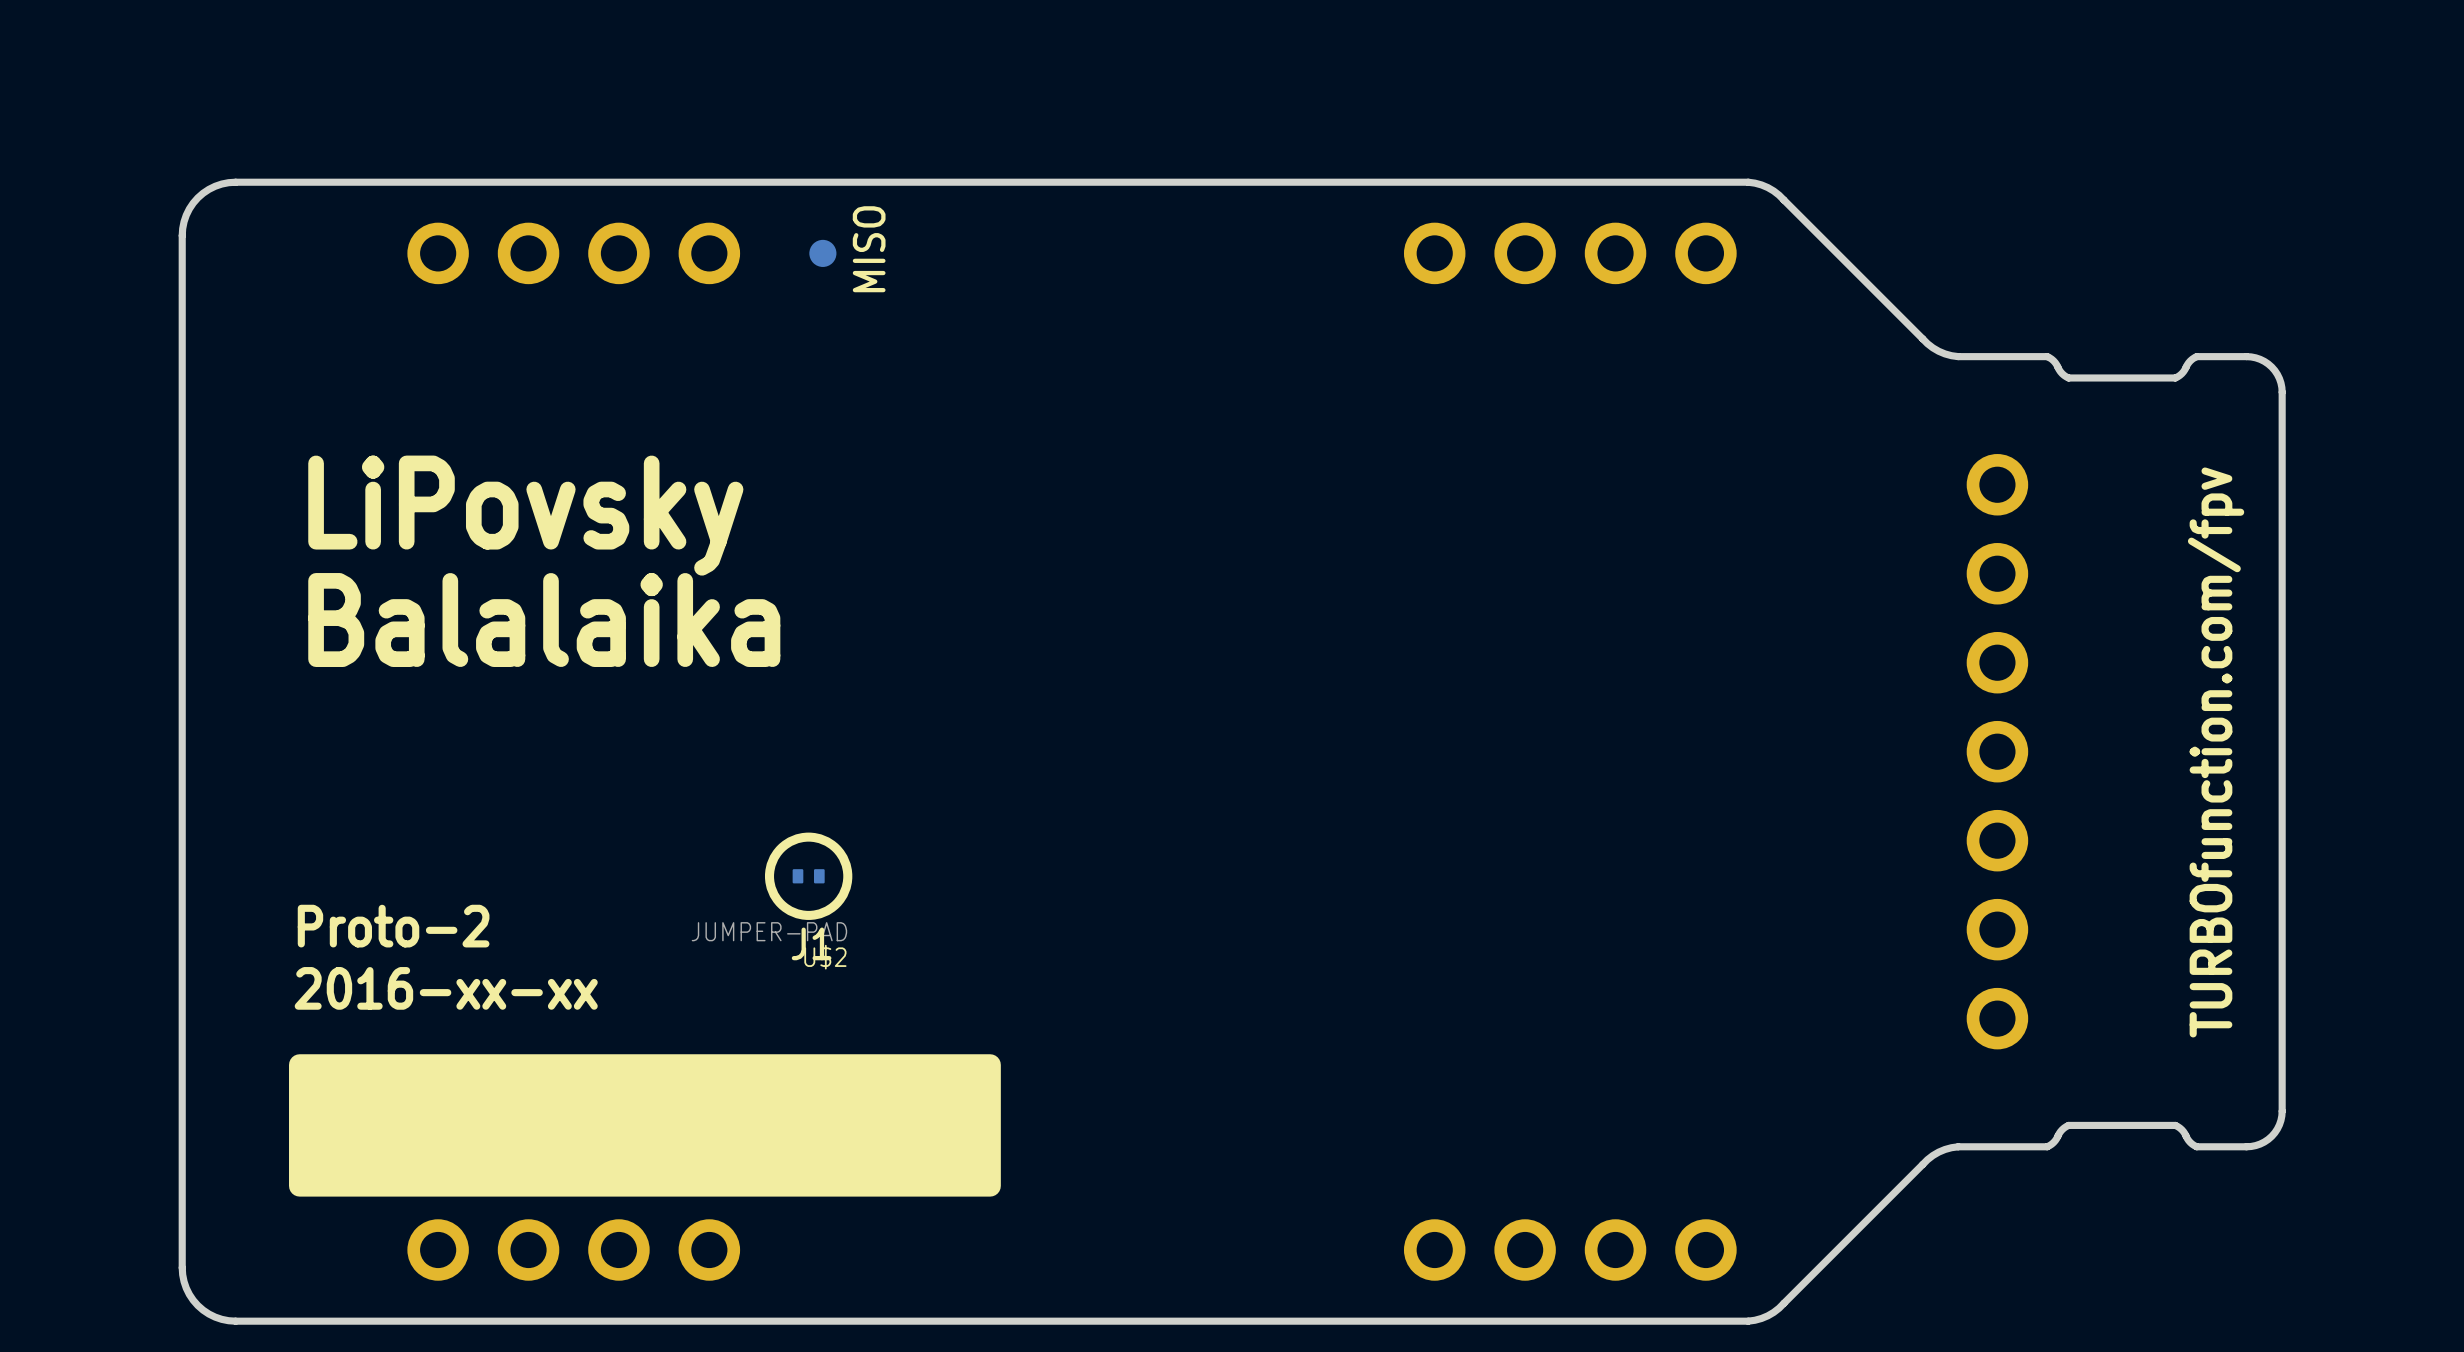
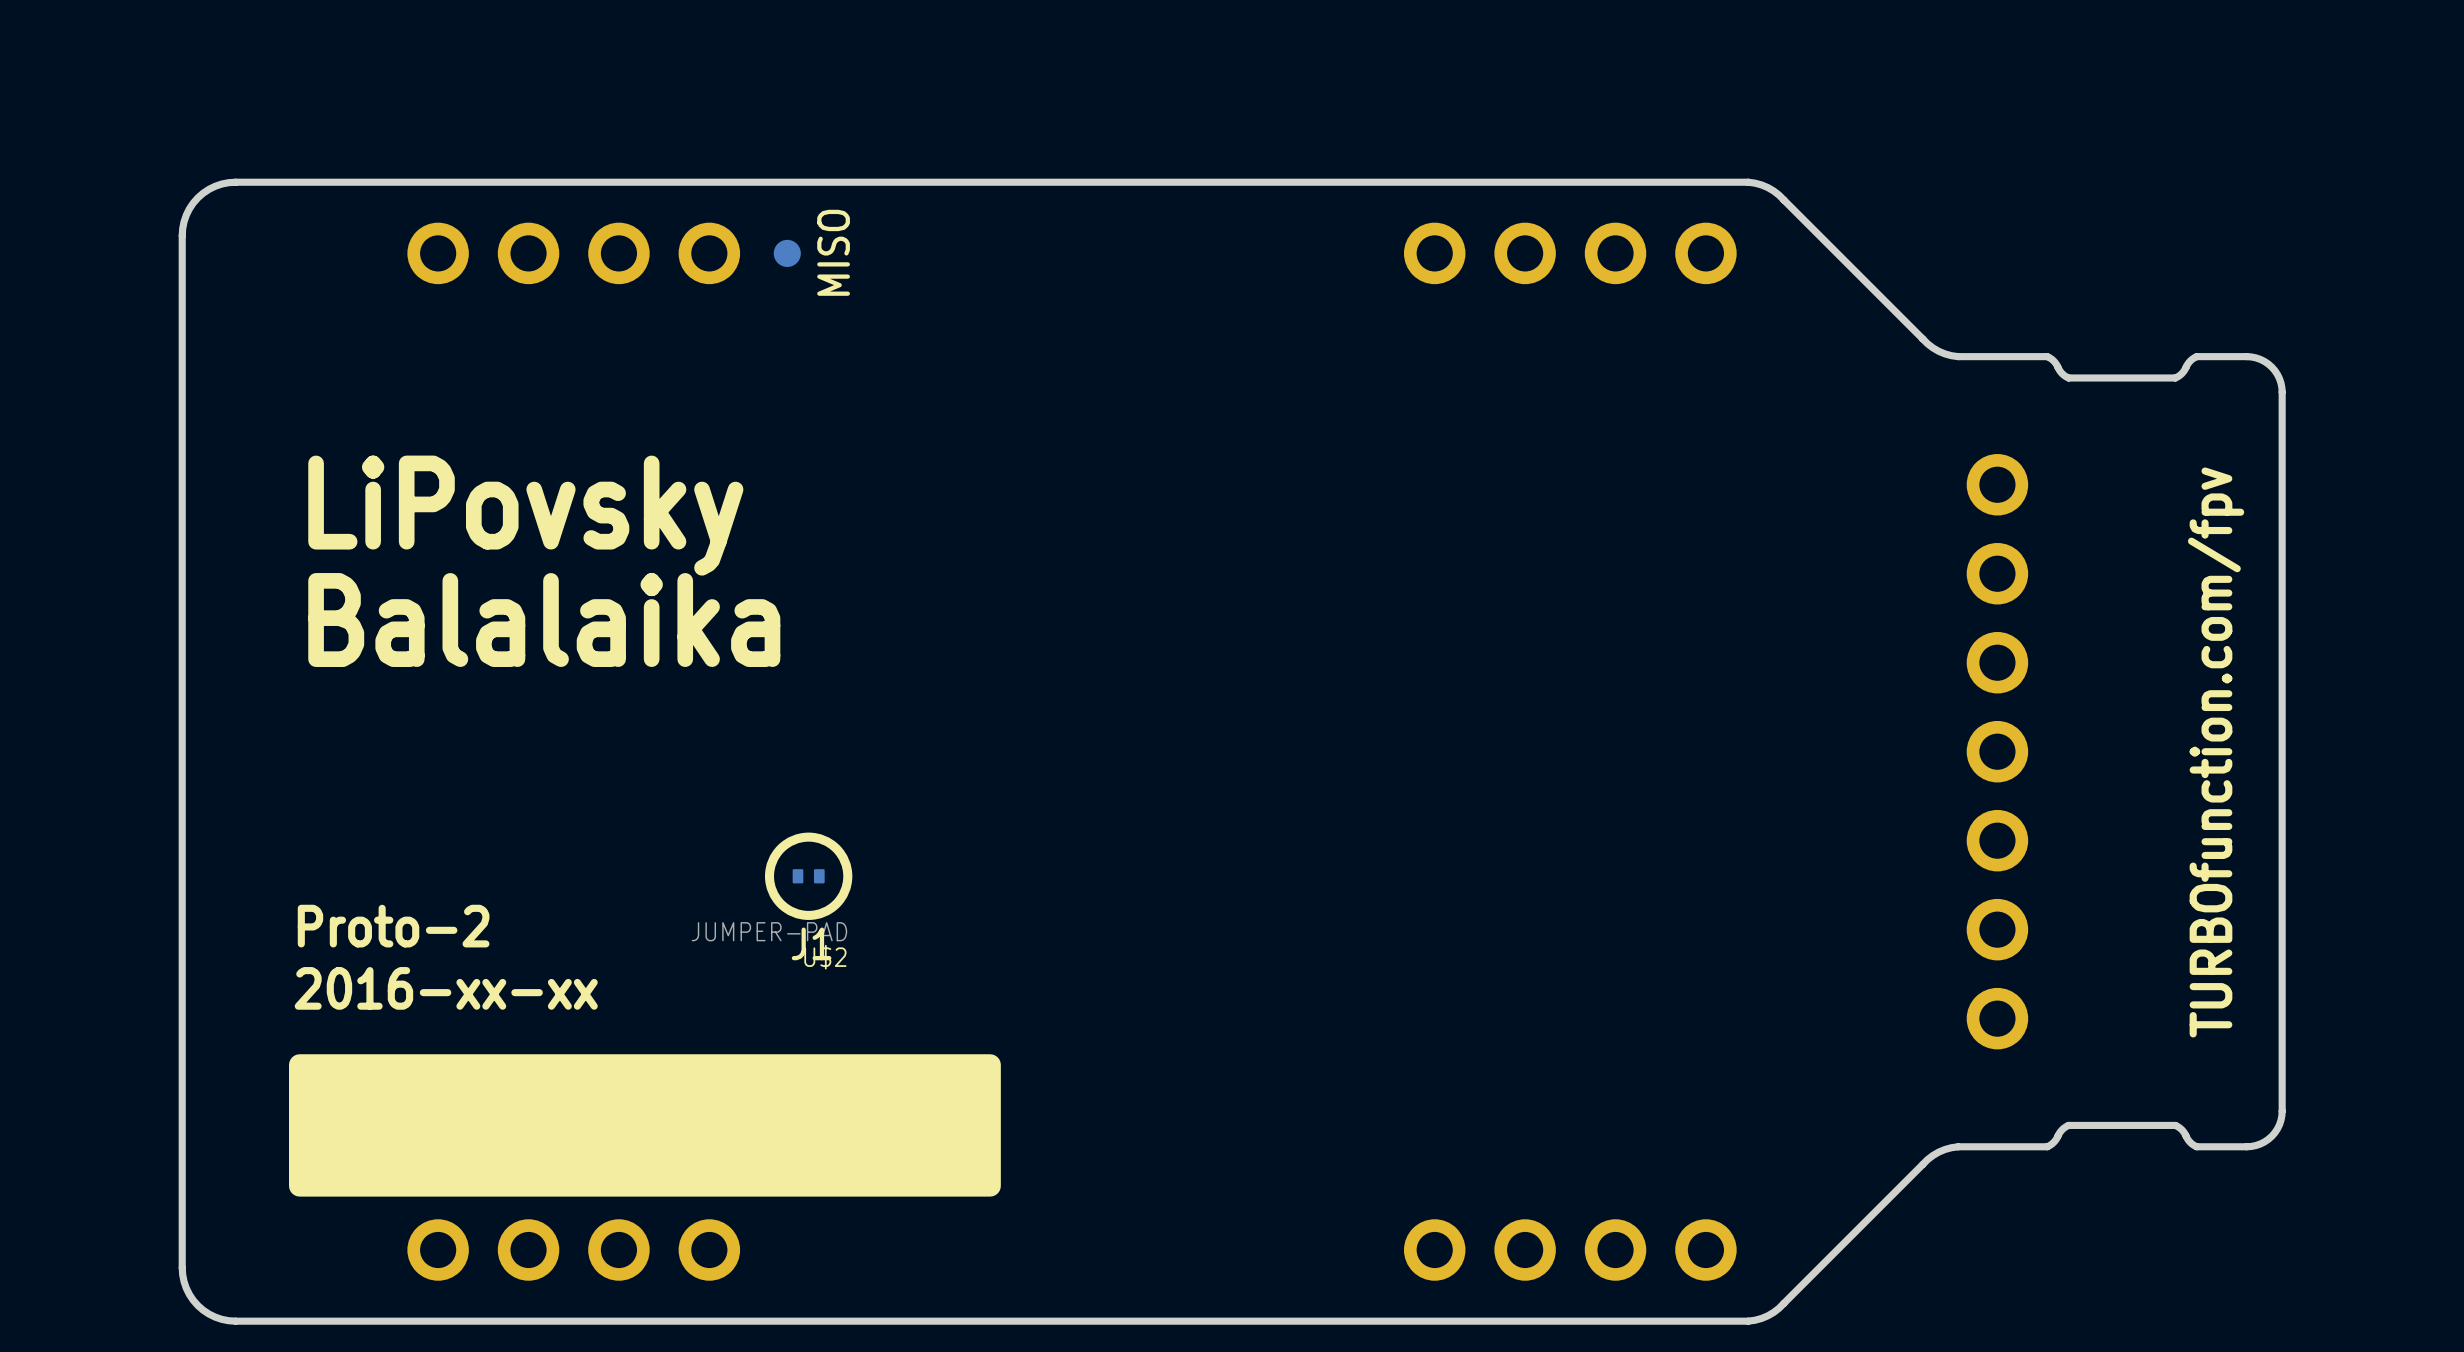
text position: MISO (869, 249) -> MISO (833, 252)
part position: (822, 253) -> (787, 253)

